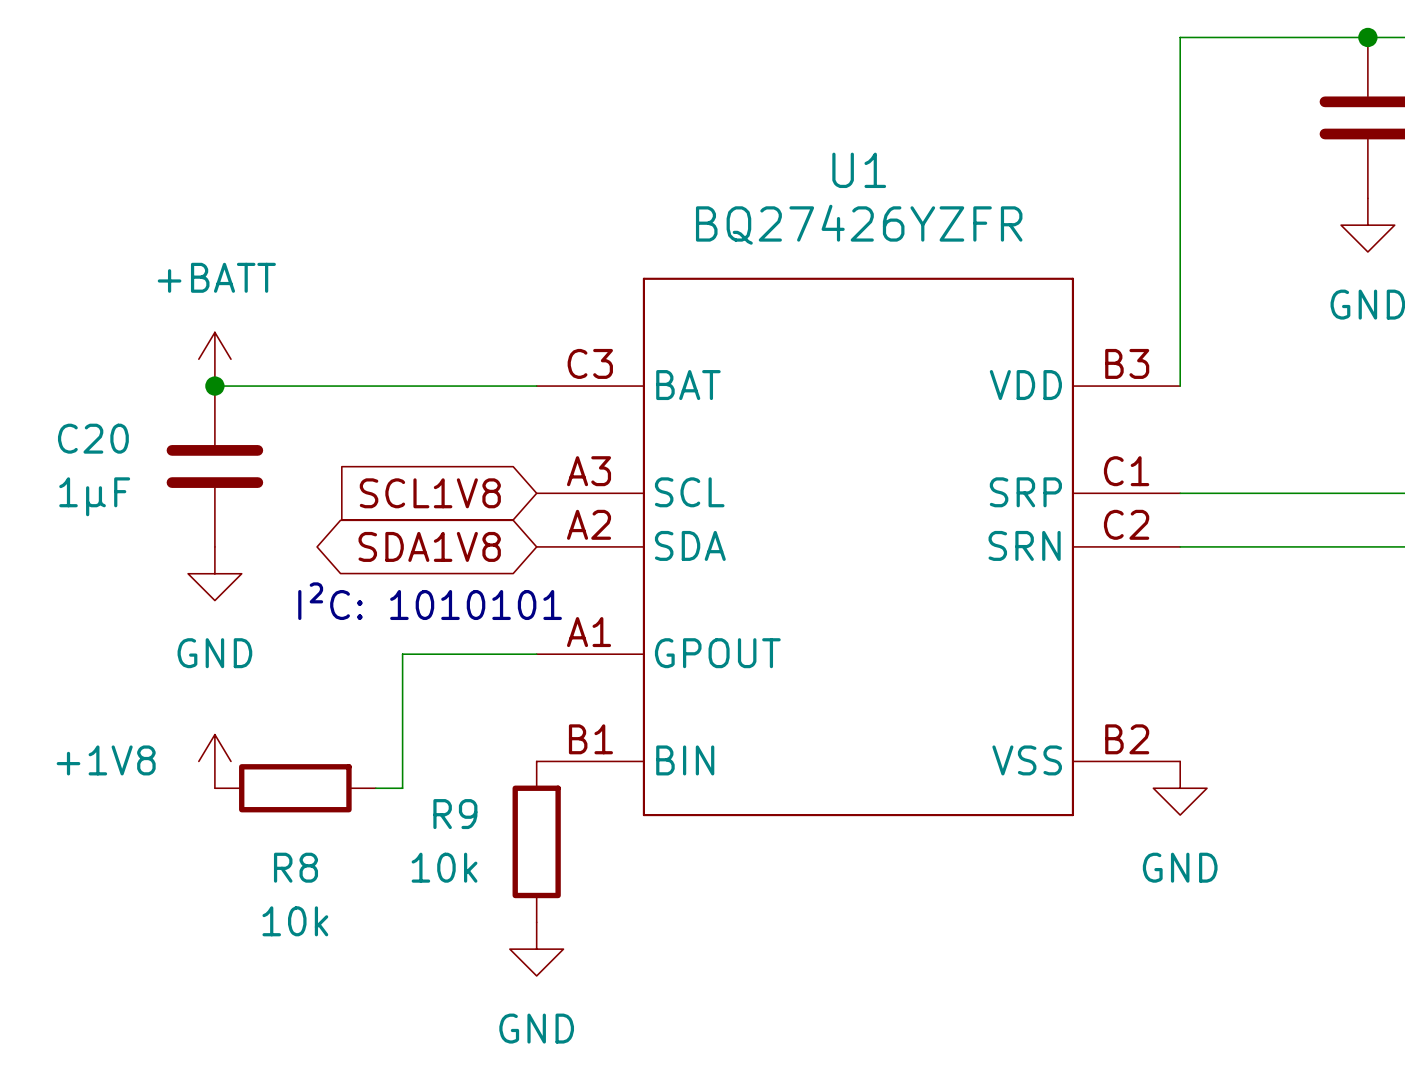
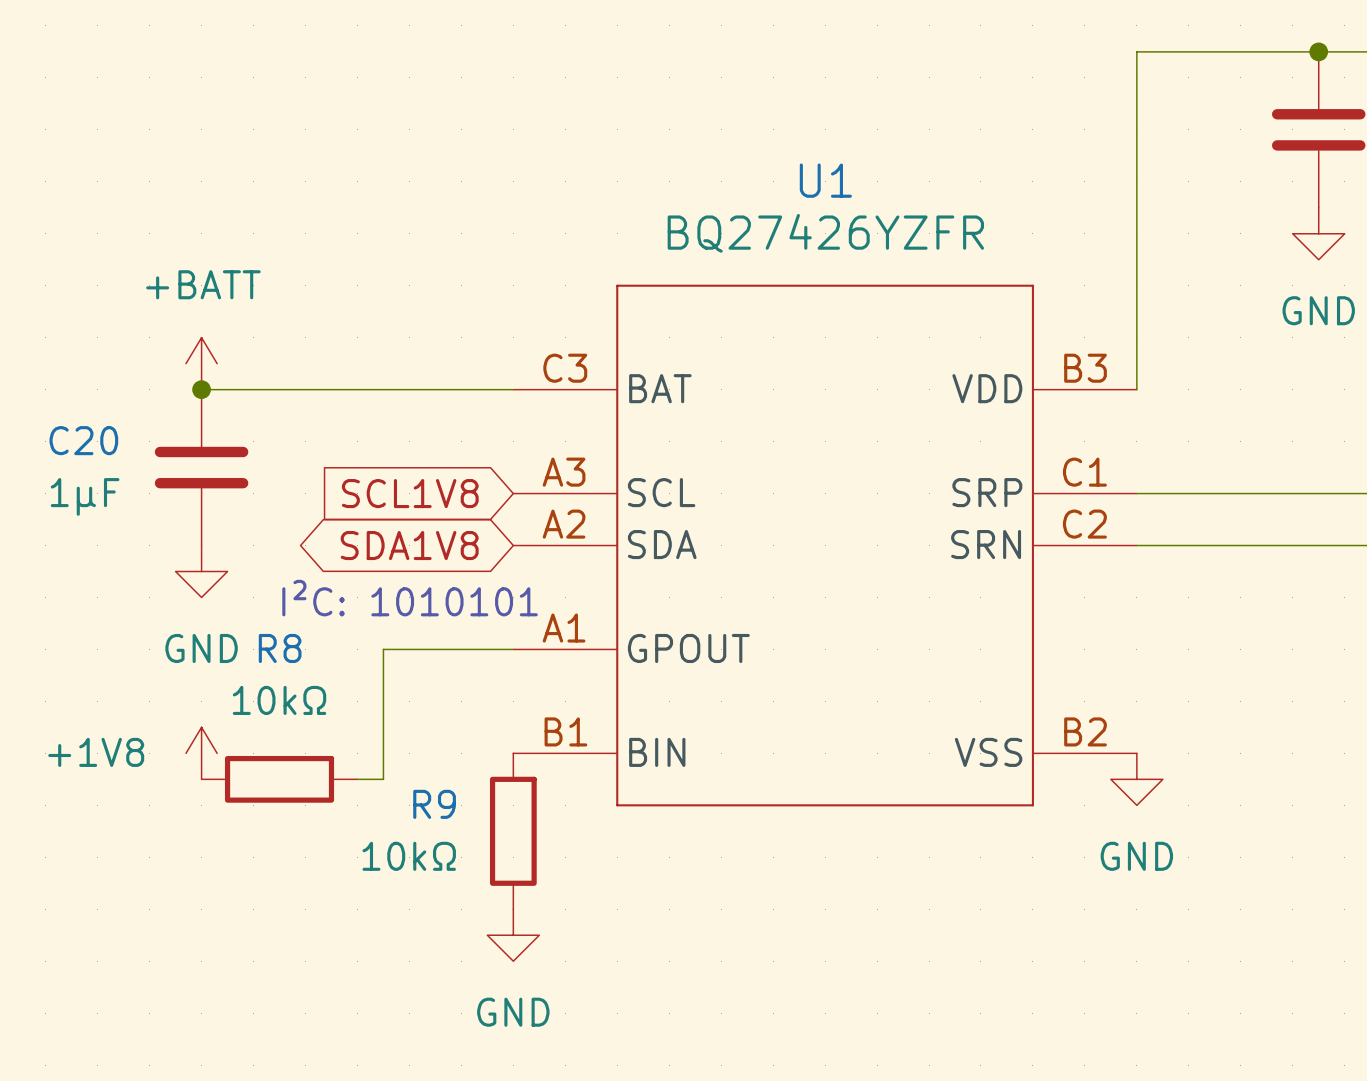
R8 name position: R8 (295, 867) -> R8 (280, 648)
R9 value: 10k (444, 867) -> 10kΩ (409, 856)
R8 value: 10k (295, 921) -> 10kΩ (279, 700)

